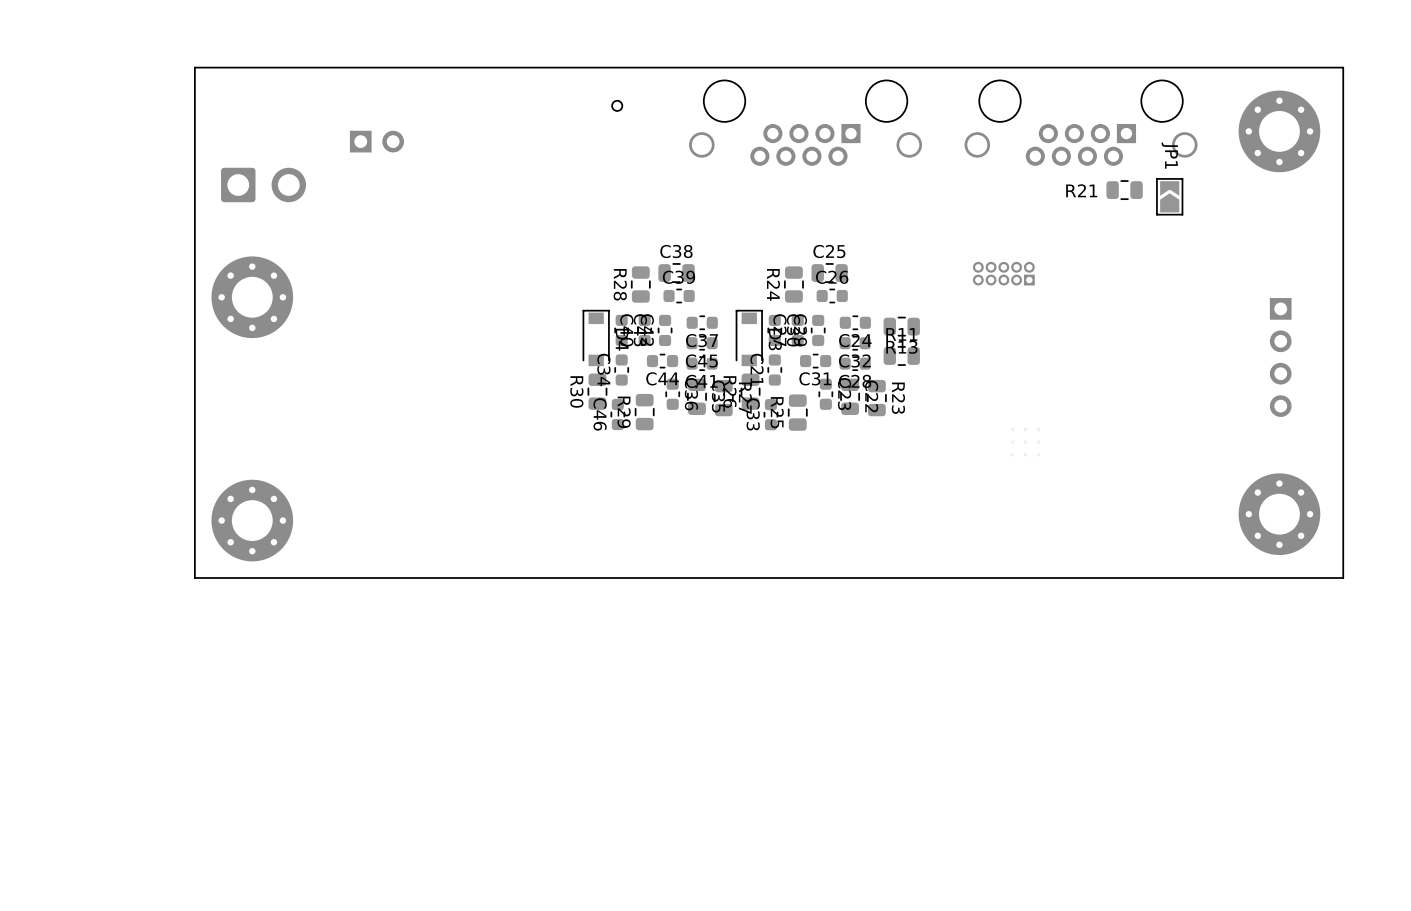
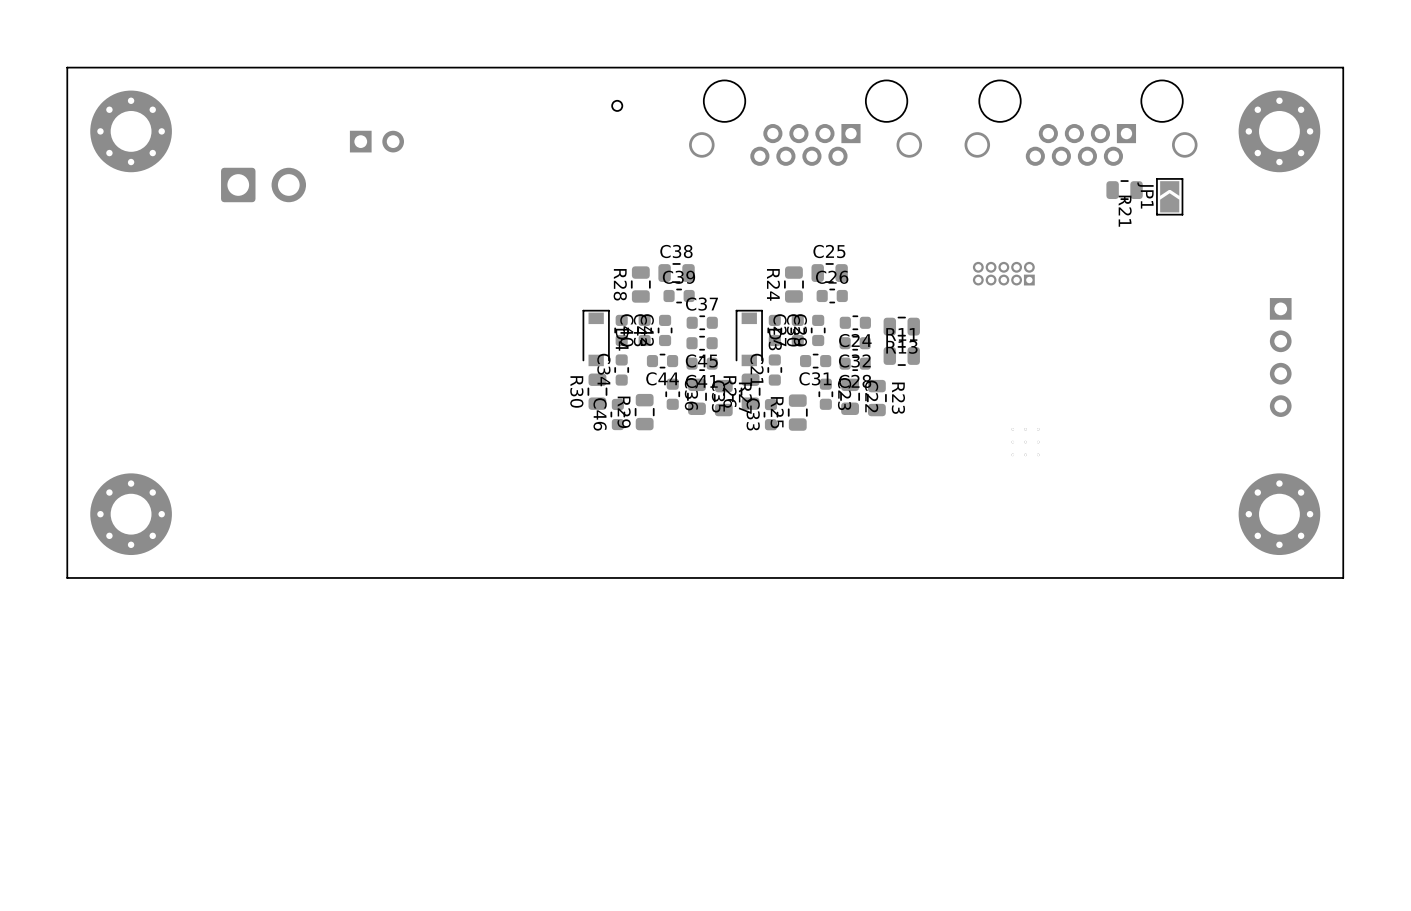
board edge: (194, 67) (194, 577) -> (194, 67) (67, 67) (67, 577) (194, 577)
part: none -> (131, 131)
JP1 name position: JP1 (1169, 155) -> JP1 (1145, 195)
R21 name rotation: 0° (1081, 190) -> 90° clockwise (1125, 211)
R21 name position: R21 (1081, 190) -> R21 (1125, 211)
part: (252, 297) -> none
C37 name position: C37 (701, 340) -> C37 (701, 304)
part position: (252, 520) -> (131, 514)

